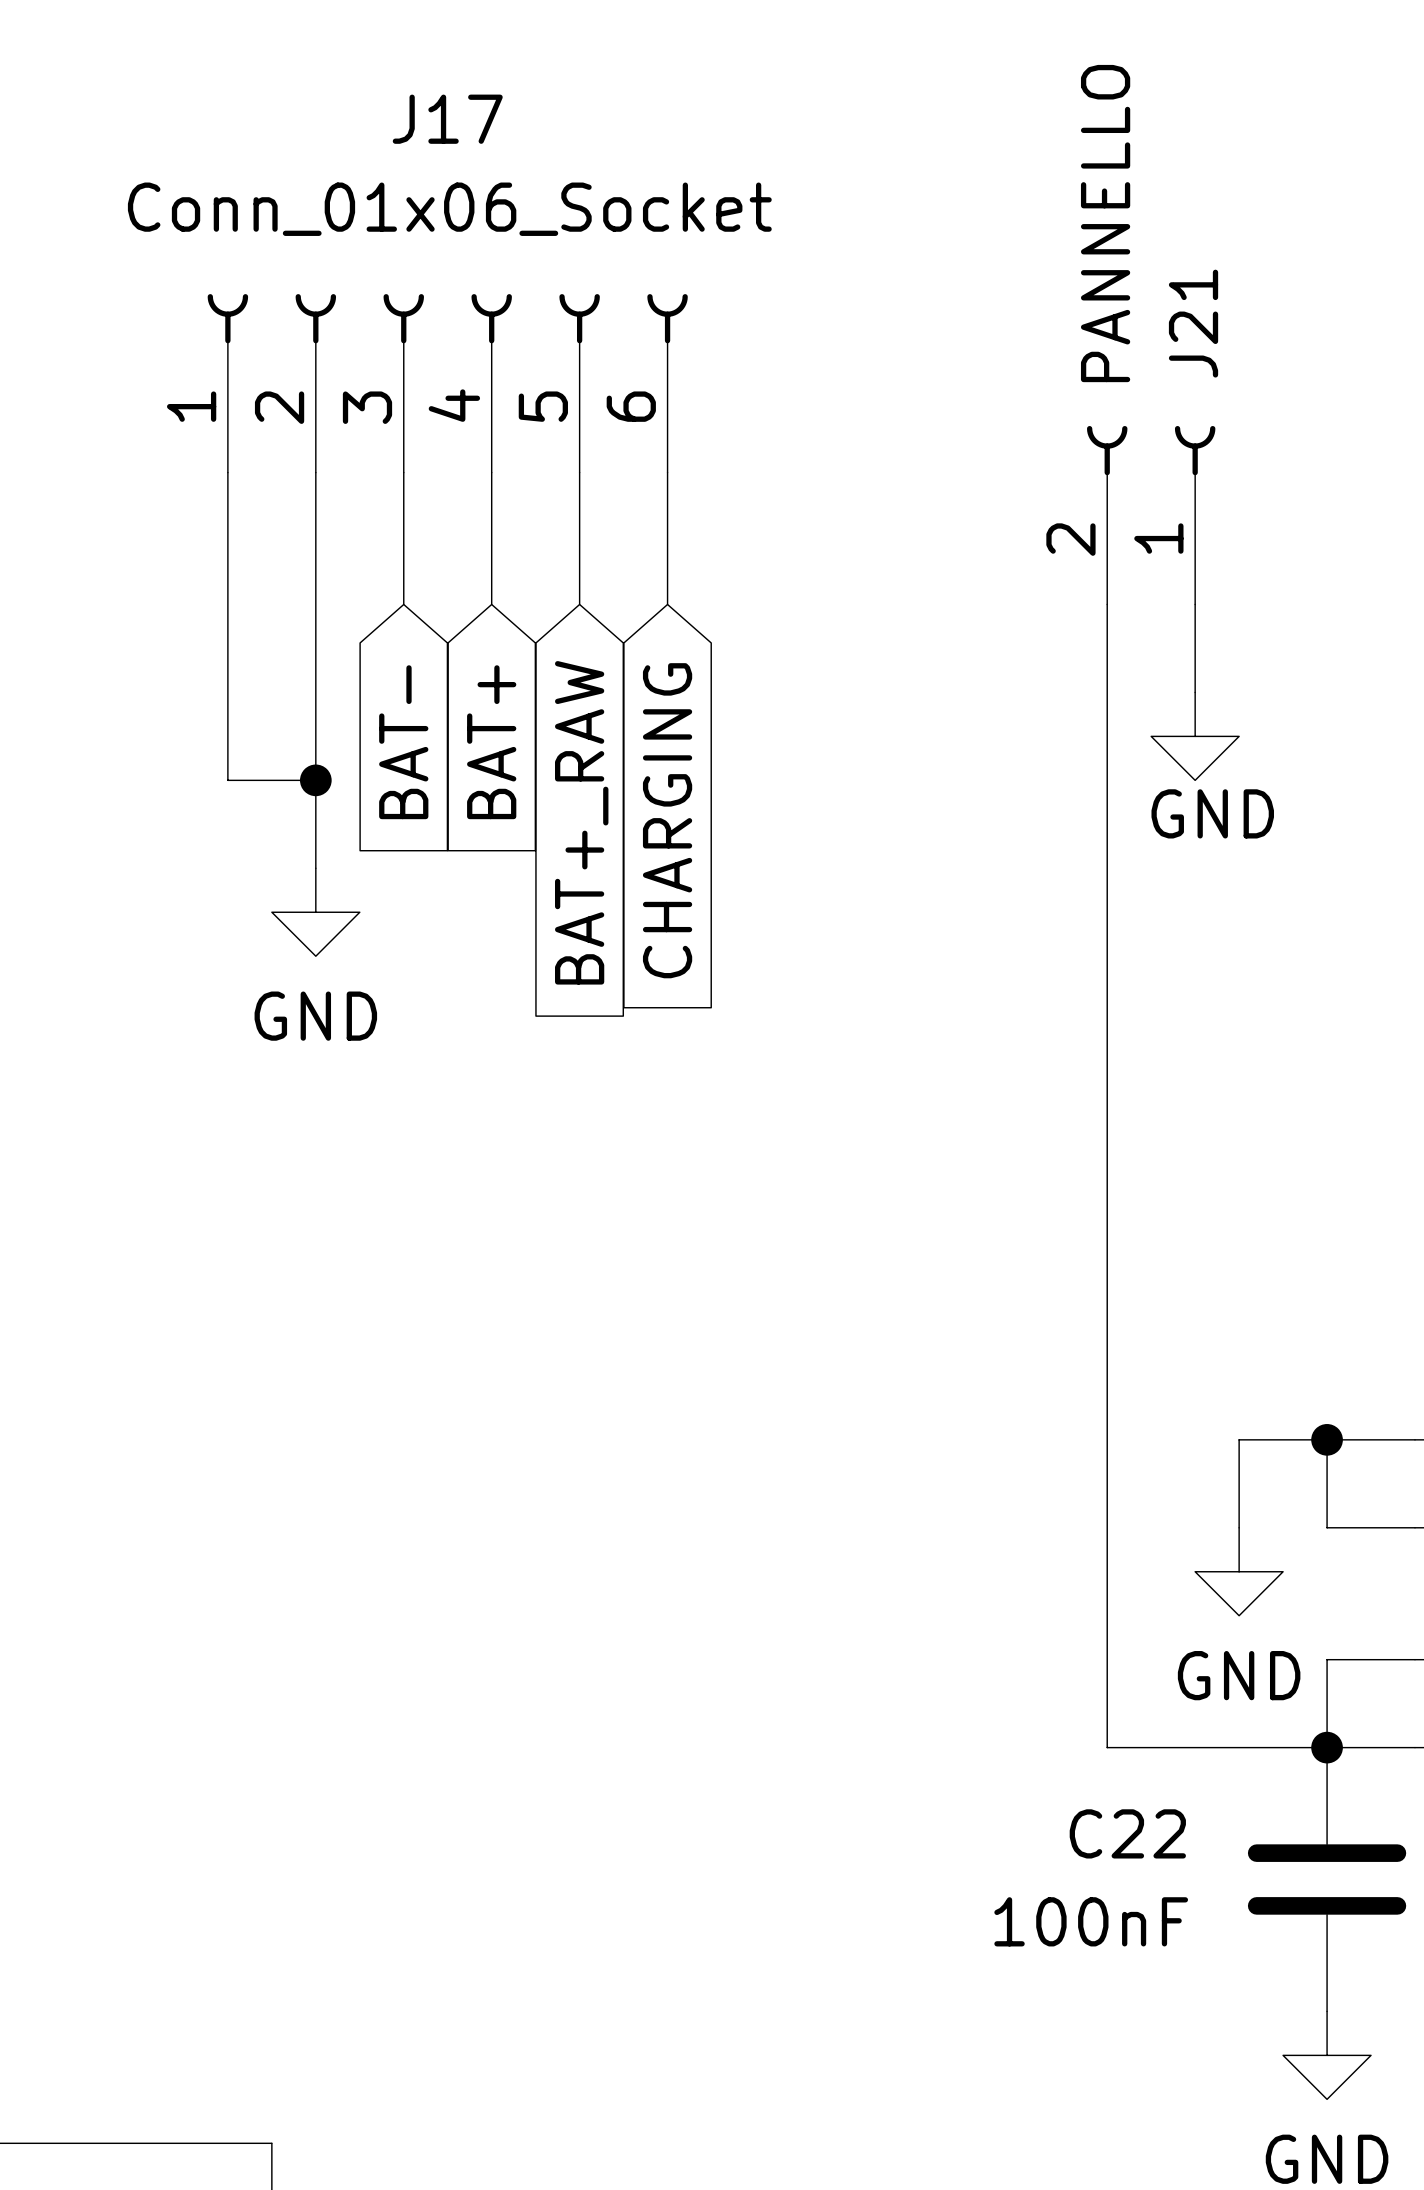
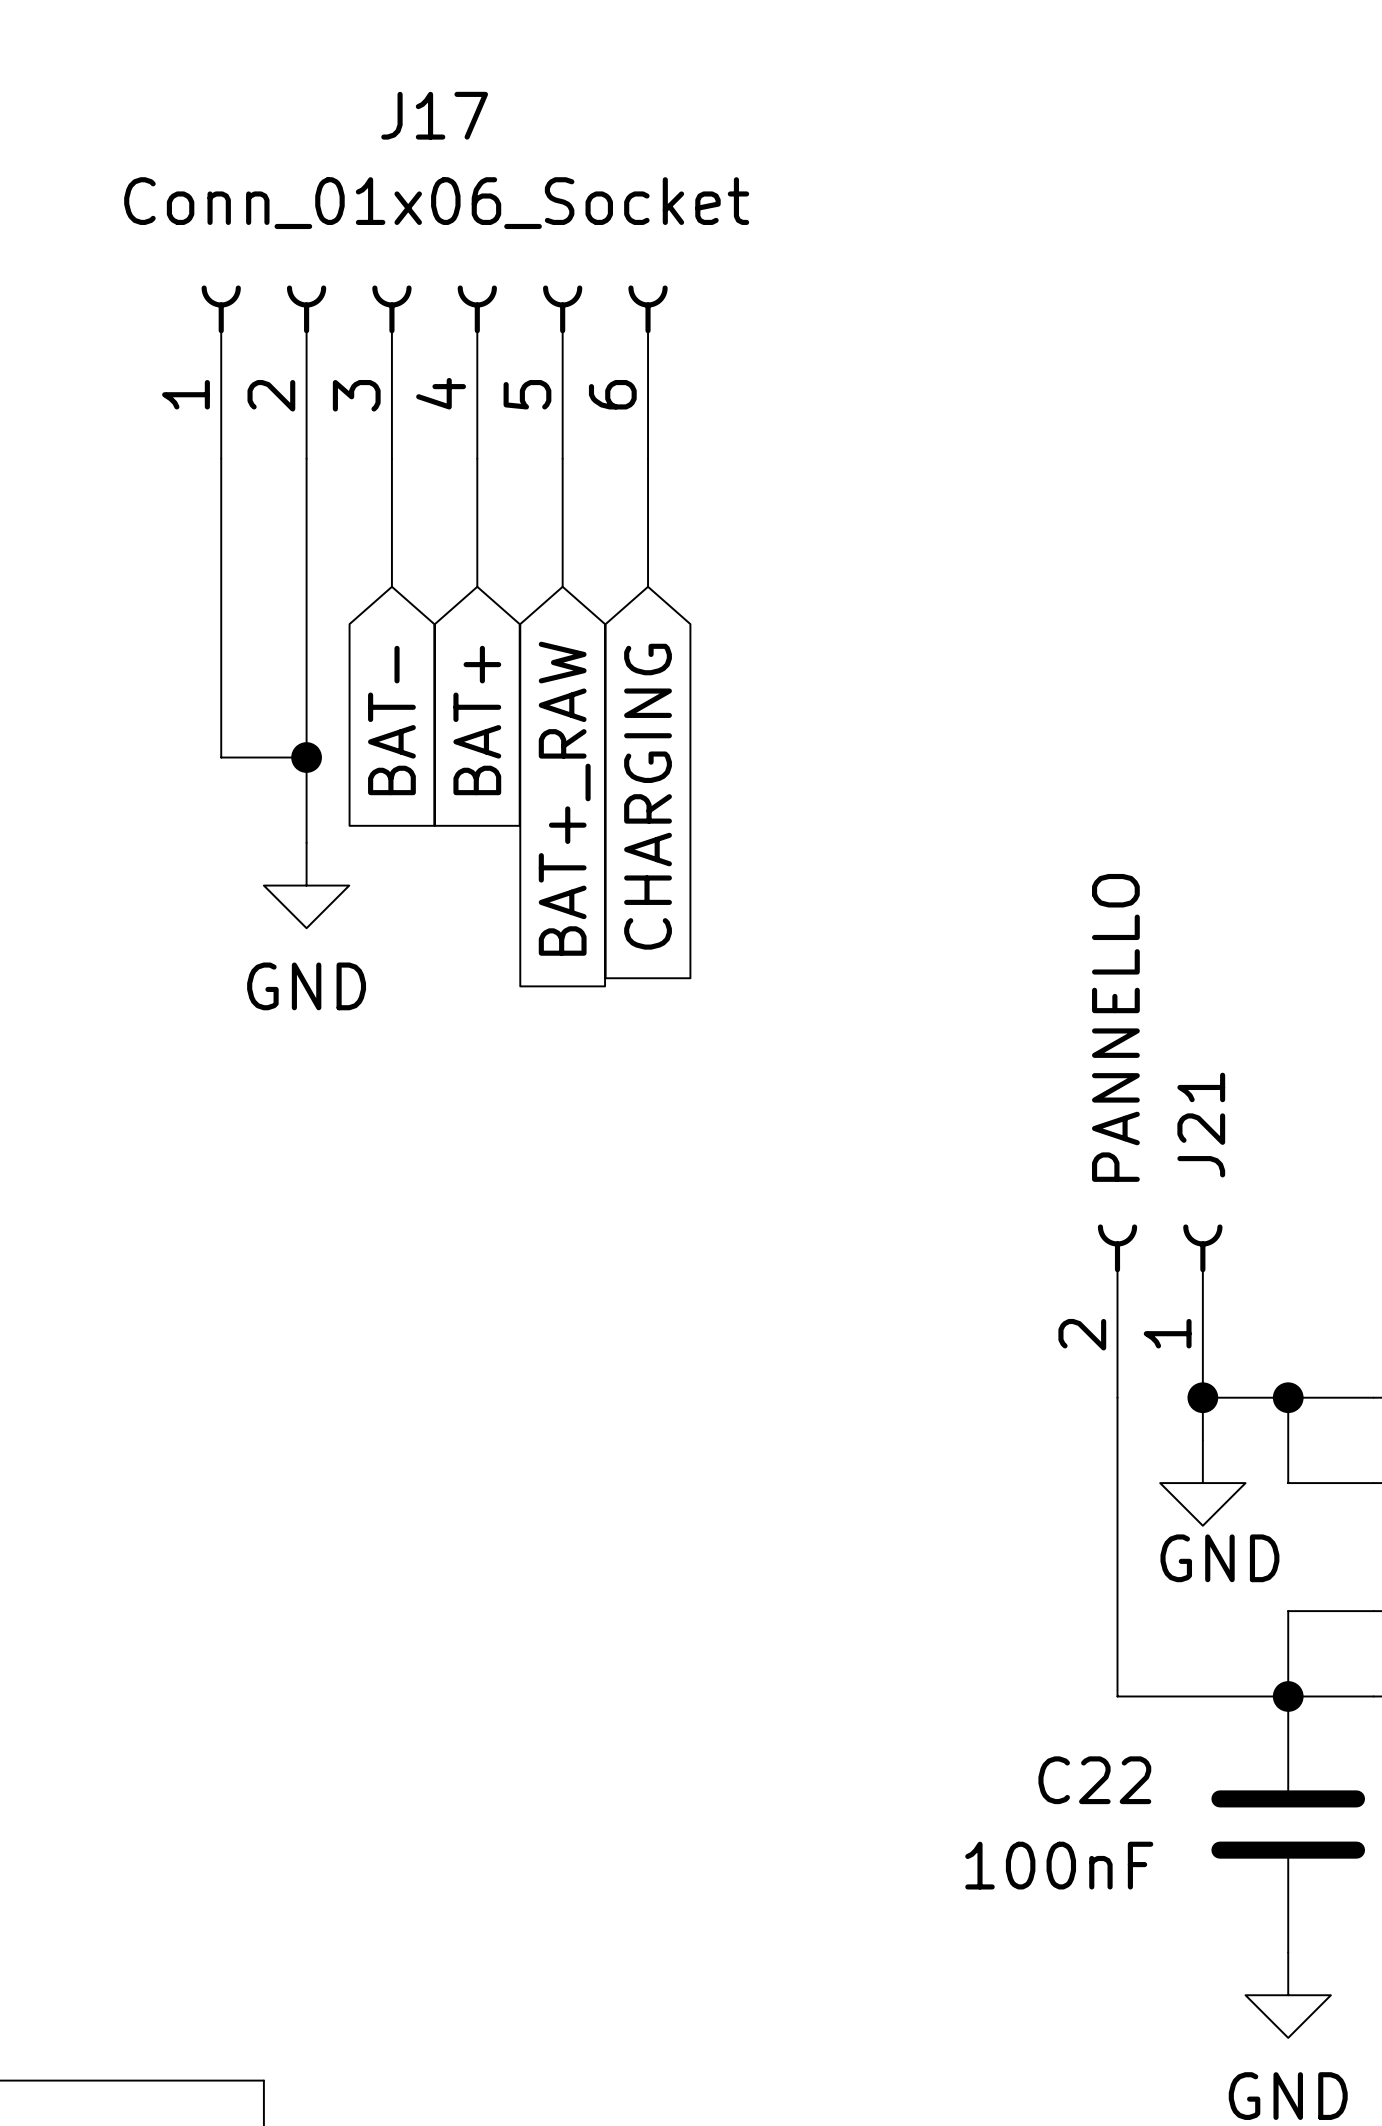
J21 position: (1151, 515) -> (1160, 1311)
wire: (1107, 604) (1107, 1747) (1151, 1747) -> (1117, 1397) (1117, 1696)
wire: (1195, 604) (1195, 692) -> none
power symbol: GND (1195, 736) -> none
junction: none -> (1202, 1397)
power symbol position: GND (1239, 1571) -> GND (1202, 1483)
power symbol text position: GND (1239, 1675) -> GND (1219, 1558)

